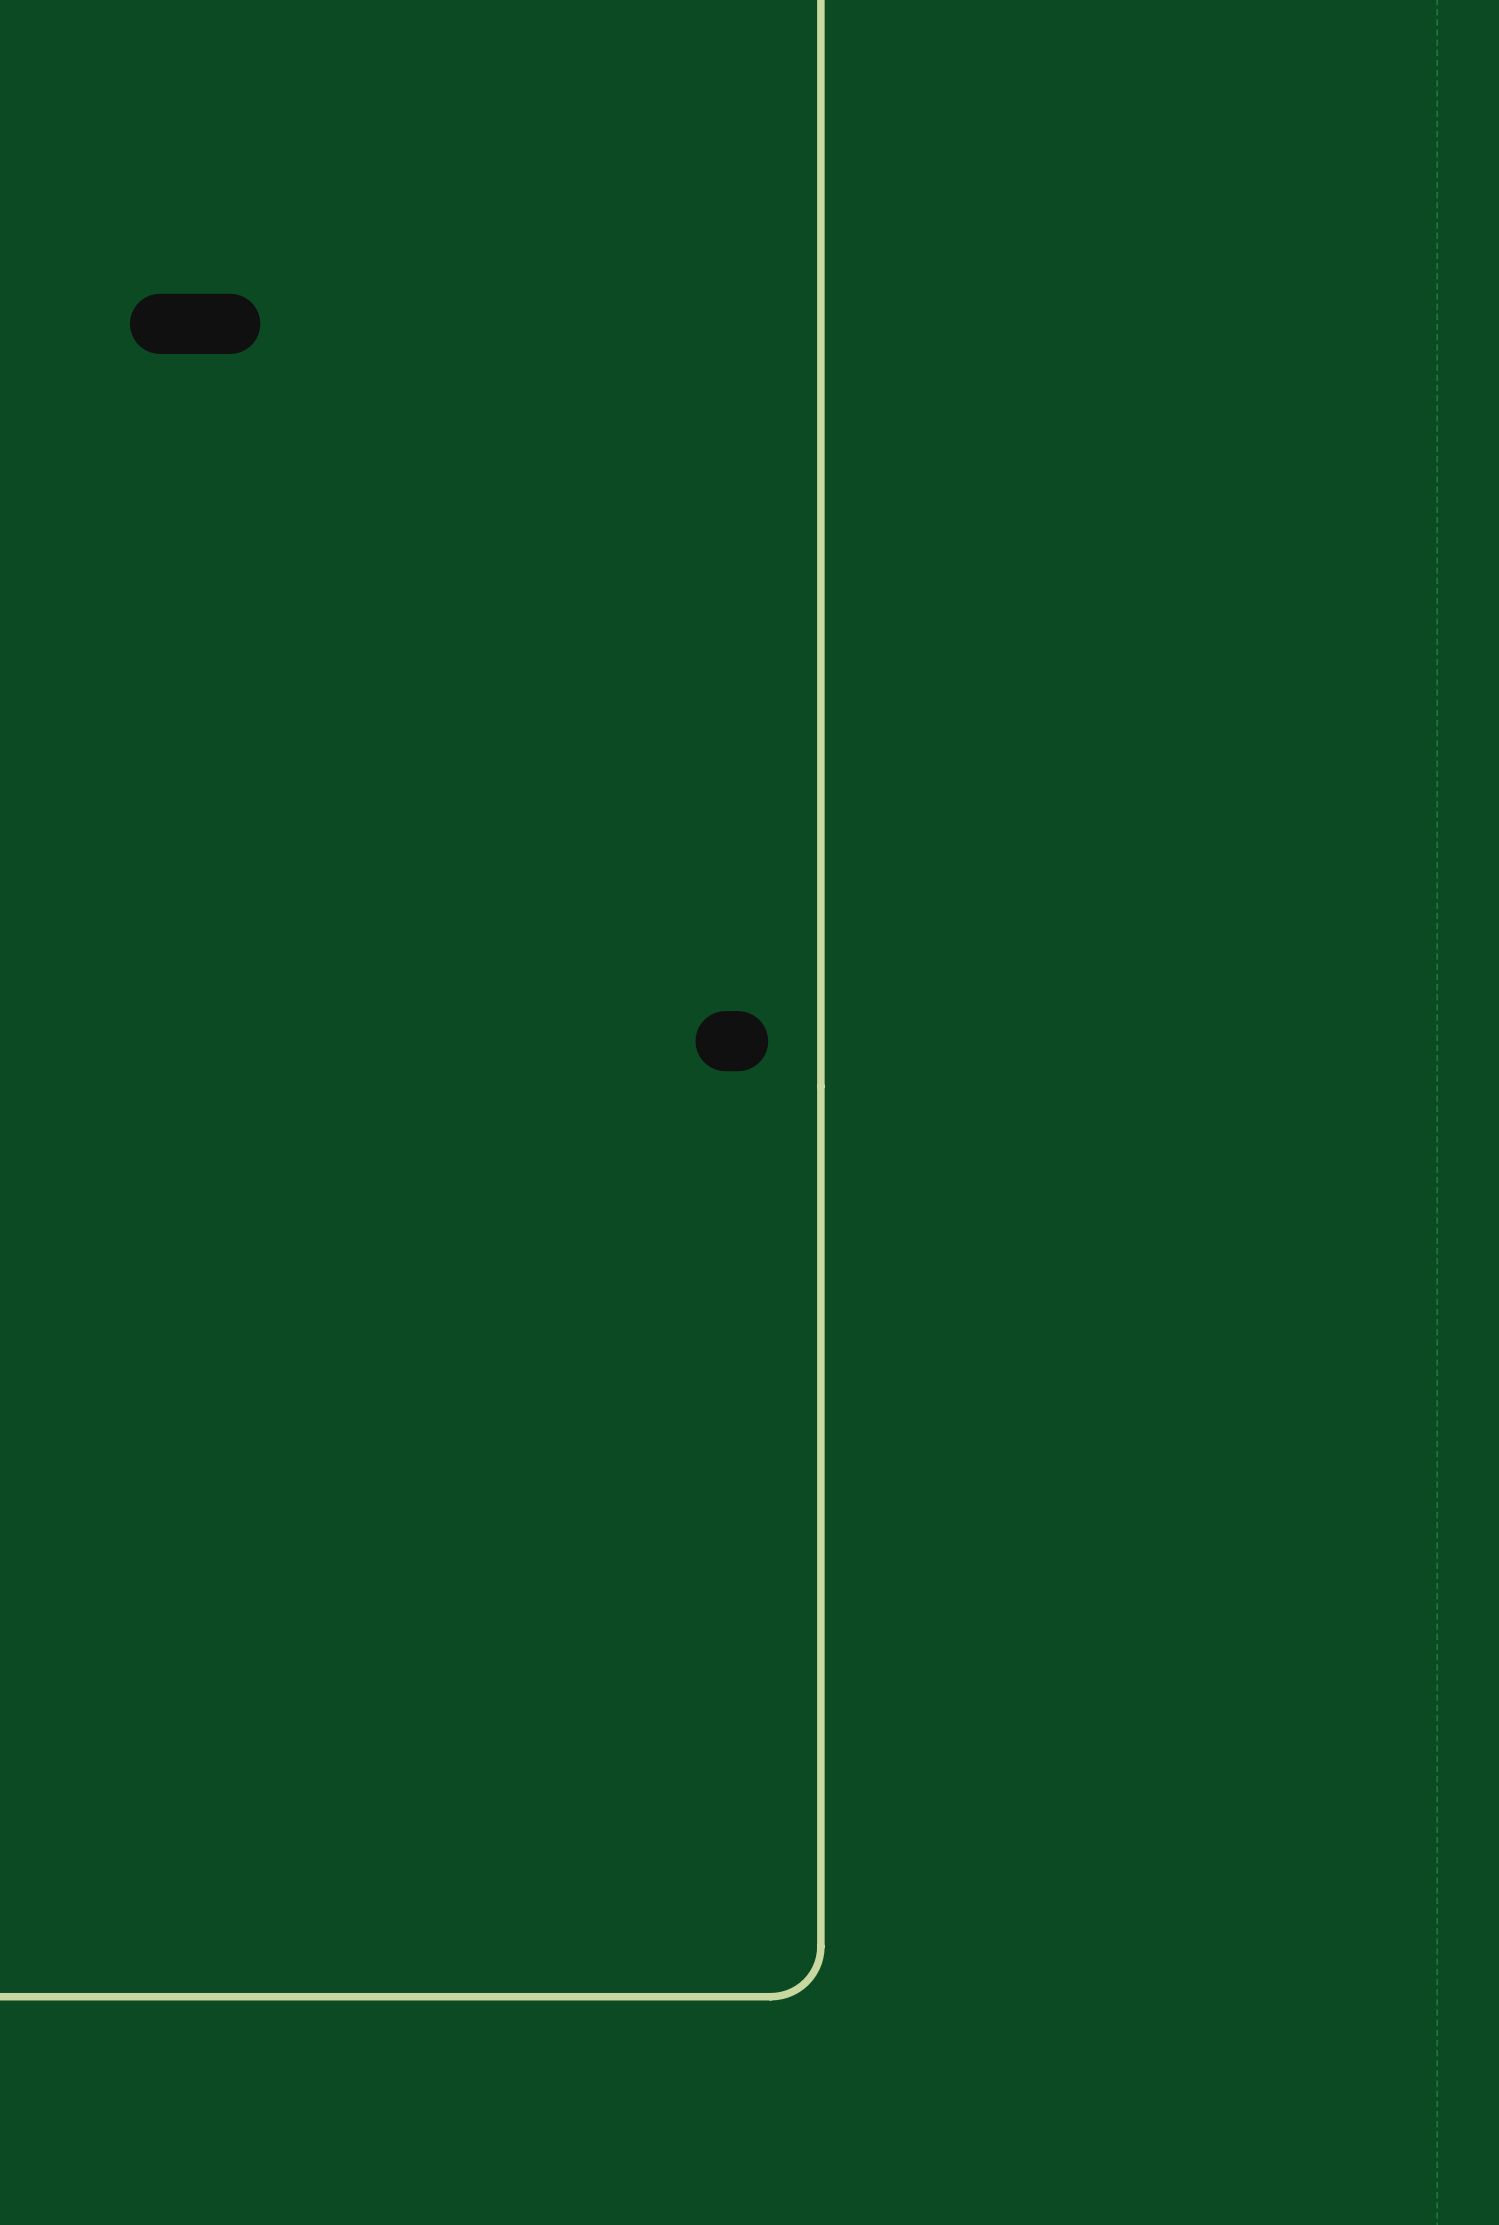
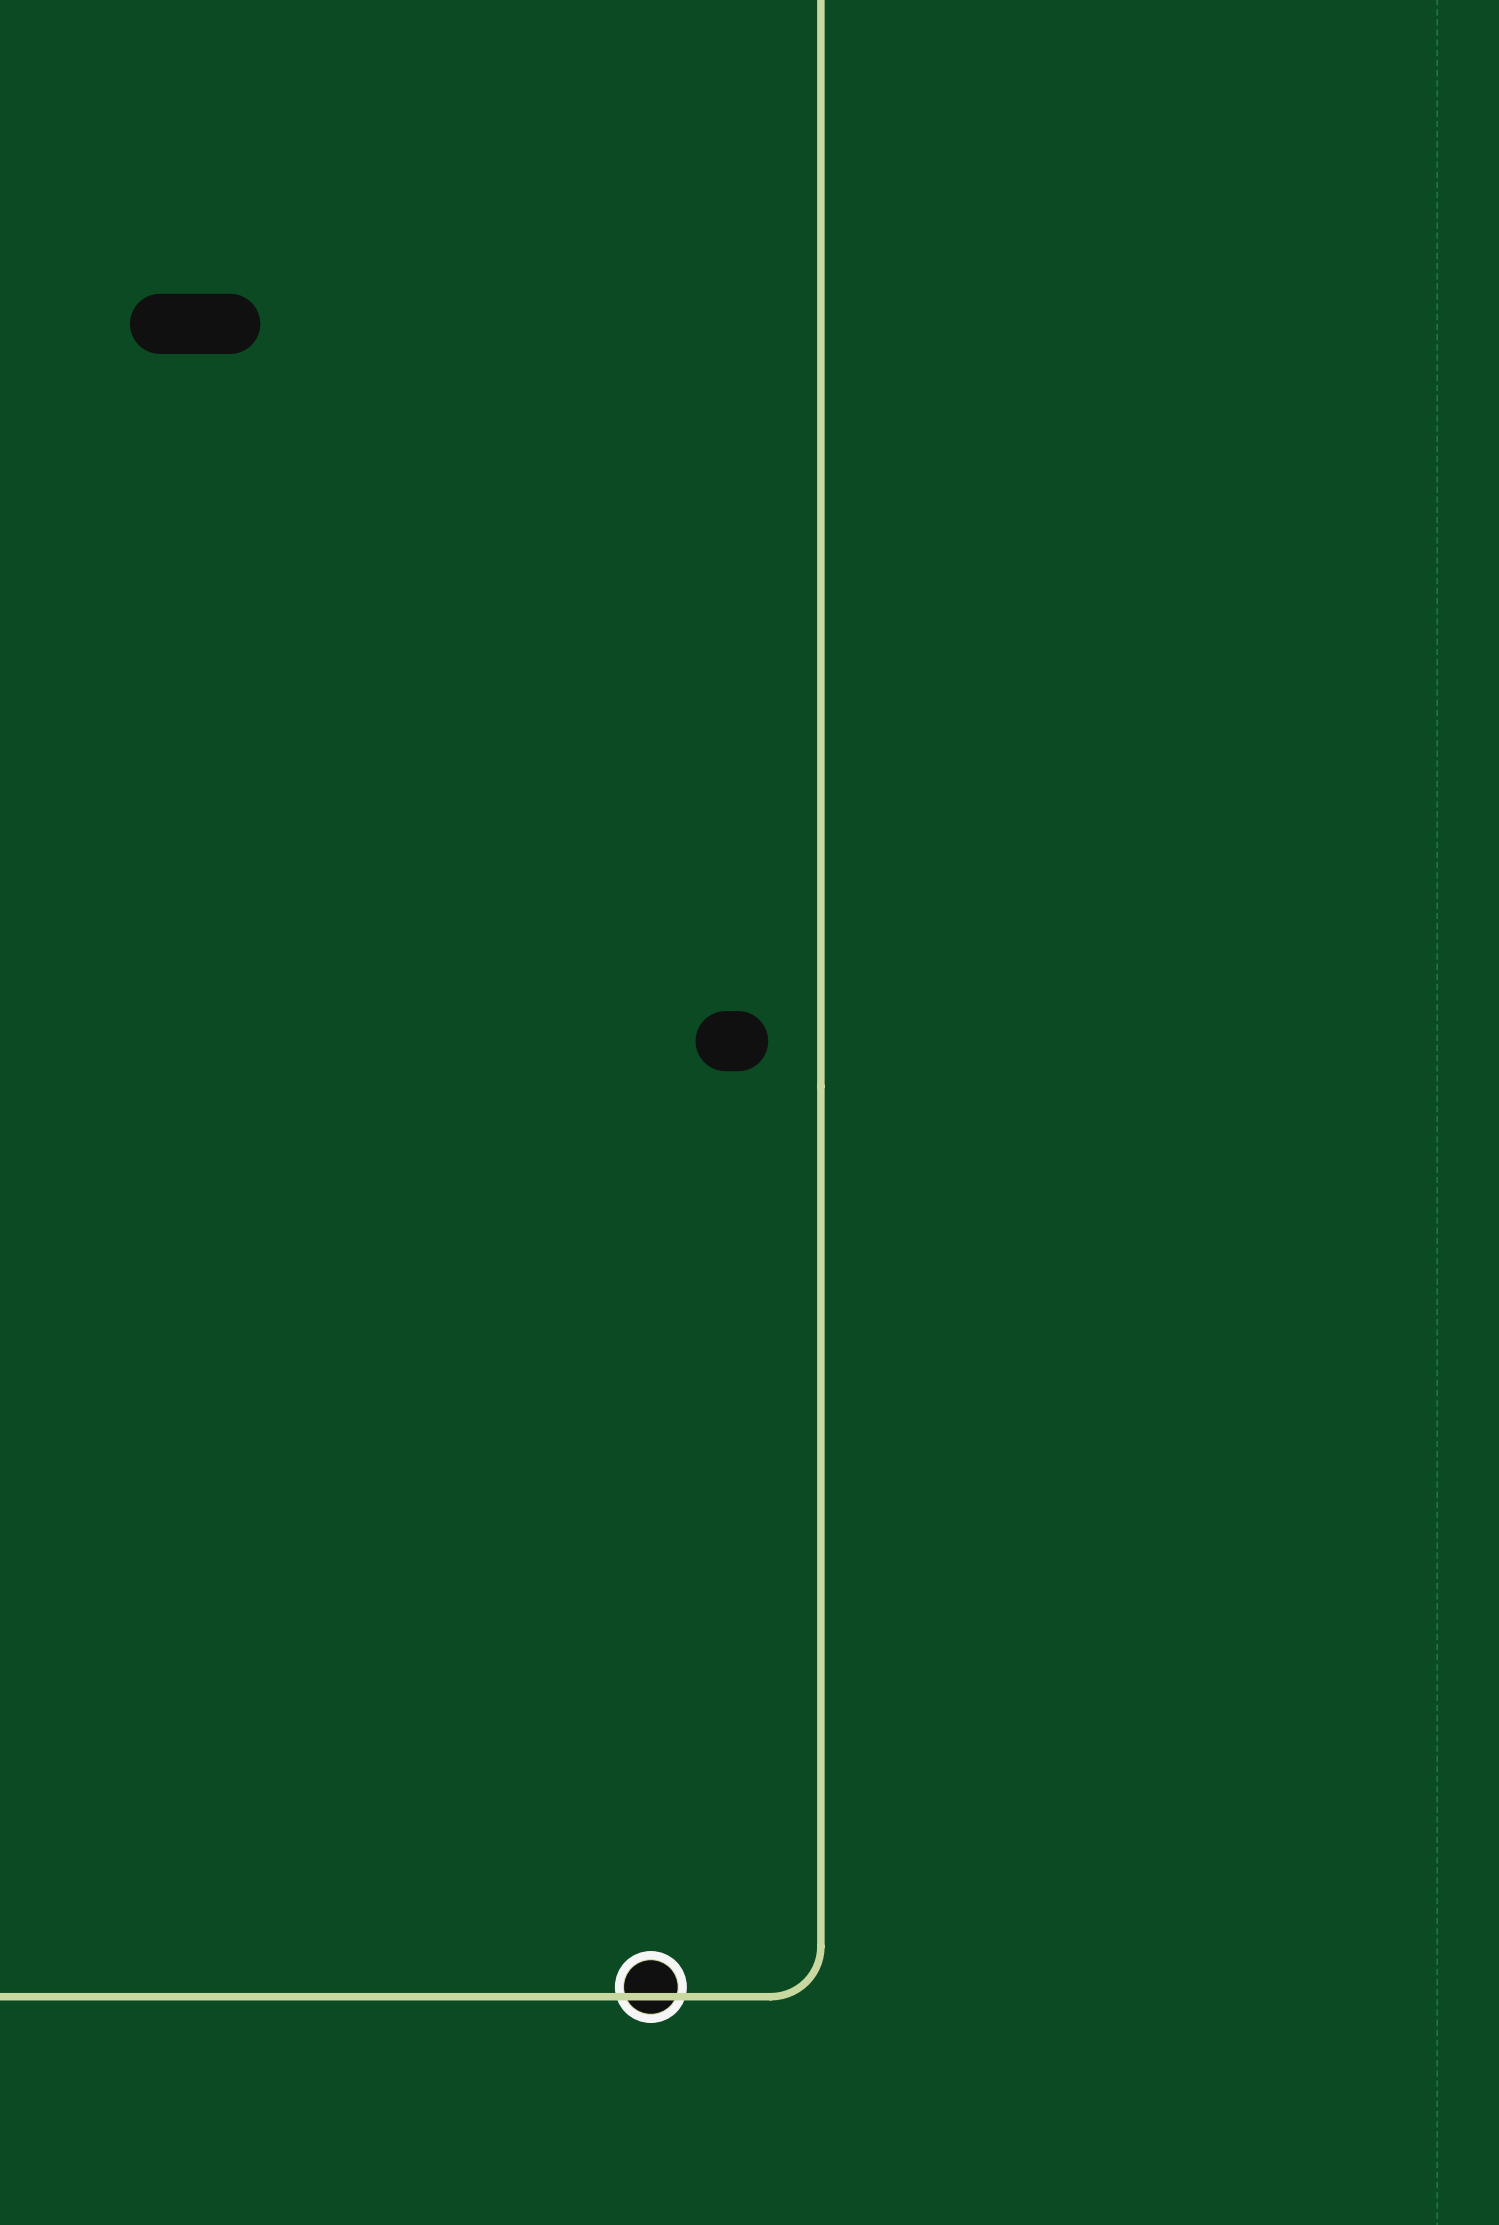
part: none -> (650, 1987)

